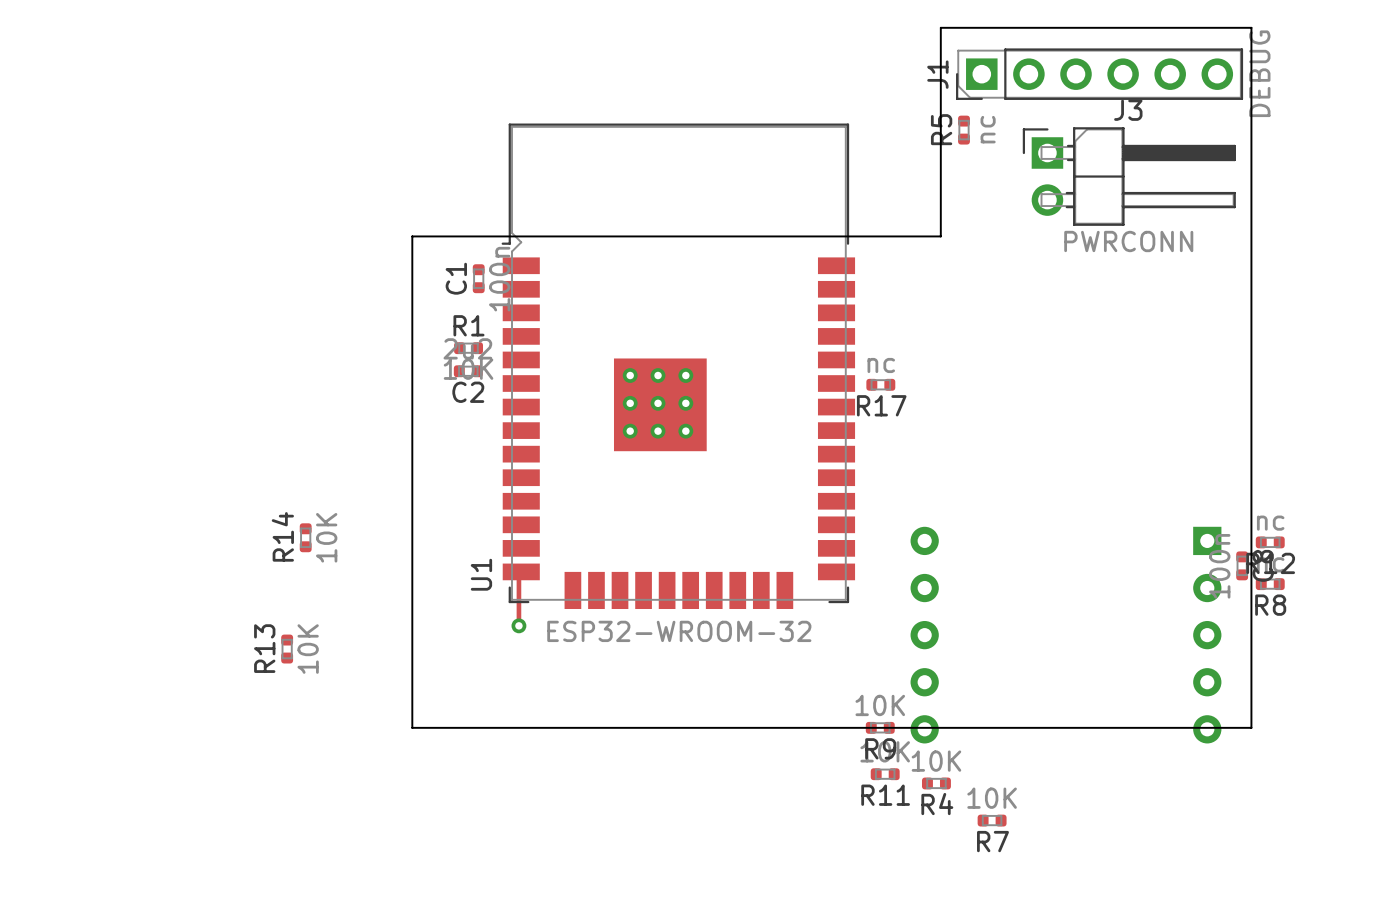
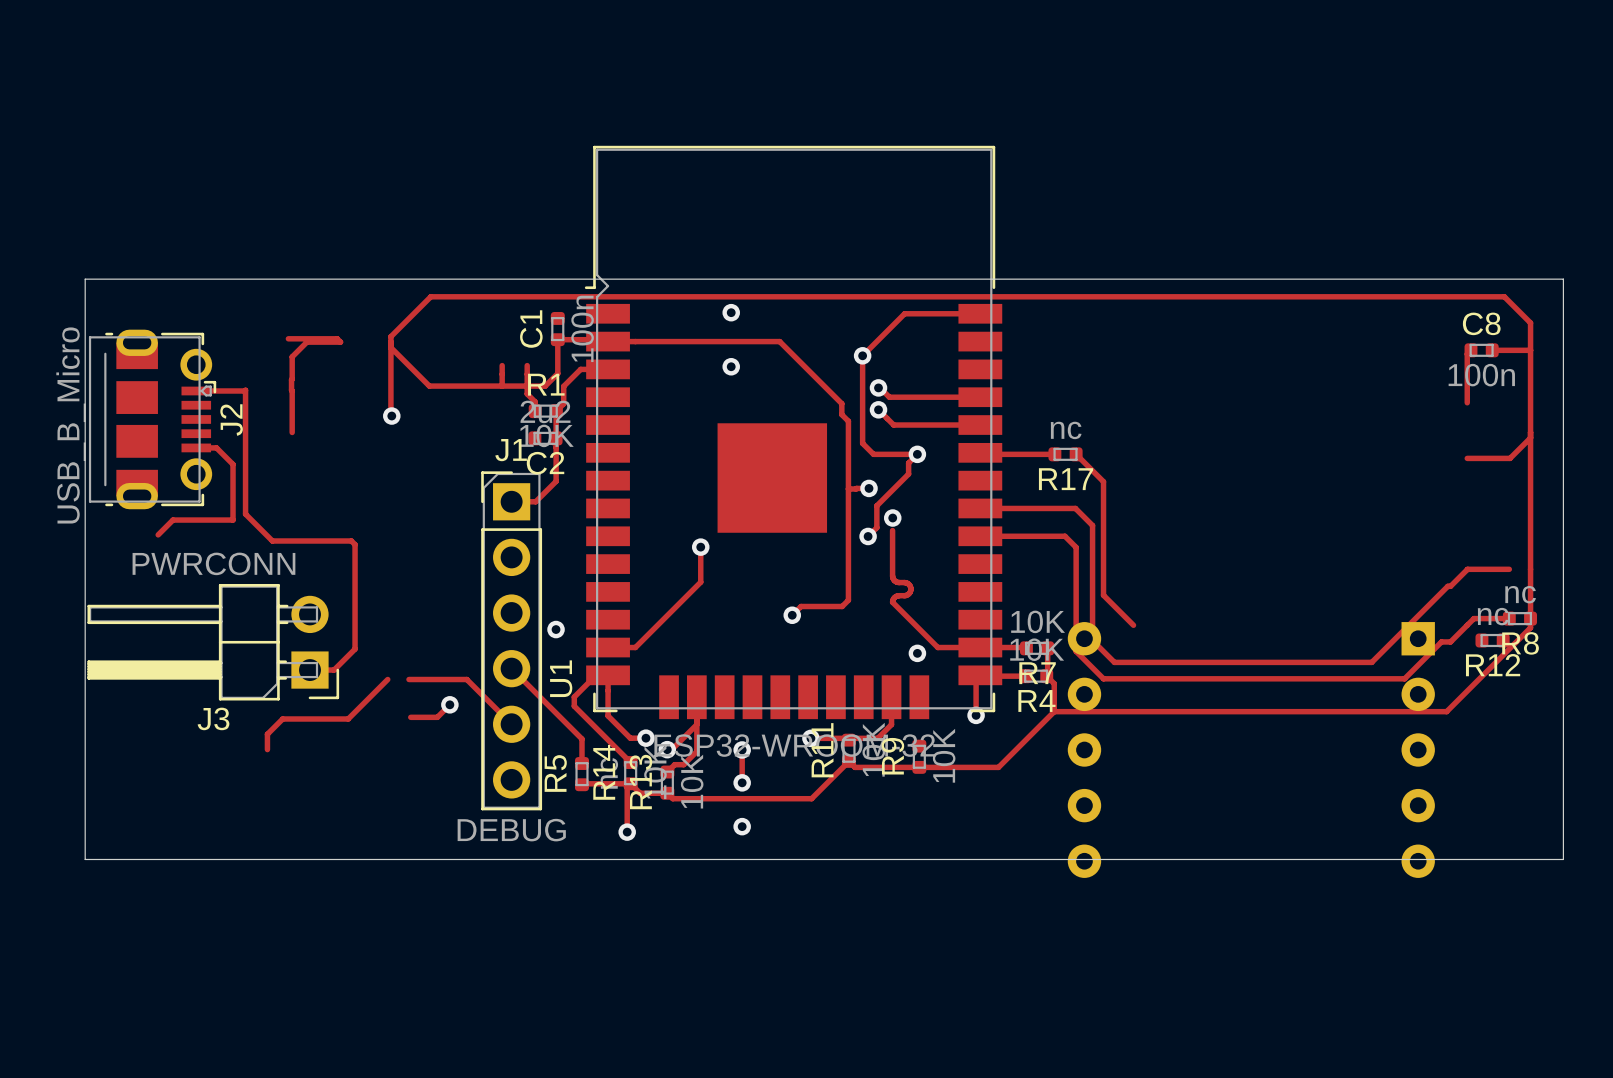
J1 rotation: 0° (1099, 74) -> 90° clockwise (511, 640)
J1 position: (1099, 74) -> (511, 640)
R5 position: (963, 130) -> (581, 774)
J3 rotation: 0° (1129, 176) -> 180° (213, 642)
J3 position: (1129, 176) -> (213, 642)
board edge: (412, 236) (412, 727) -> (479, 279) (85, 279) (85, 859) (479, 859)
board edge: (940, 236) (940, 27) (1251, 27) (1251, 727) -> (1103, 279) (1563, 279) (1563, 859) (1470, 859)
via: none -> (731, 312)
track: none -> (980, 313) (904, 313) (862, 355) (862, 443) (873, 454) (917, 454) (908, 463) (908, 474) (876, 505) (876, 527) (868, 536)
track: none -> (288, 338) (337, 338) (340, 342) (306, 342) (292, 356) (292, 432)
track: none -> (390, 347) (429, 386) (545, 386) (557, 373) (557, 339) (779, 341) (841, 403) (841, 414) (848, 421) (848, 600) (842, 606) (801, 606) (792, 615)
track: none -> (1470, 350) (1467, 354) (1467, 402)
track: none -> (1492, 350) (1530, 350)
via: none -> (862, 355)
track: none -> (502, 365) (502, 386)
track: none -> (527, 365) (527, 393) (535, 401) (535, 411)
via: none -> (731, 366)
track: none -> (608, 369) (580, 369) (563, 386) (563, 403) (556, 411) (556, 481) (535, 501) (511, 501)
track: none -> (878, 387) (889, 397) (980, 397)
via: none -> (878, 387)
track: none -> (196, 390) (245, 390) (245, 514) (272, 541) (351, 541) (355, 544) (355, 649) (334, 670) (309, 670)
track: none -> (878, 409) (893, 425) (980, 425)
via: none -> (878, 409)
track: none -> (391, 416) (390, 336) (430, 296) (1504, 296) (1530, 322) (1530, 627) (1446, 711) (1054, 711)
via: none -> (391, 416)
J2: none -> USB_B_Micro (152, 419)
track: none -> (1530, 437) (1510, 458) (1467, 458)
via: (630, 375) -> none
via: (658, 375) -> none
via: (685, 375) -> none
track: none -> (196, 447) (216, 447) (233, 464) (233, 520) (173, 520) (158, 534)
track: none -> (980, 452) (1054, 454)
via: none -> (917, 454)
R17 position: (880, 384) -> (1065, 454)
track: none -> (1076, 454) (1103, 481) (1103, 595) (1133, 625)
via: (630, 403) -> none
via: (658, 403) -> none
via: (685, 403) -> none
track: none -> (869, 488) (848, 488)
via: none -> (869, 488)
track: none -> (980, 508) (1075, 508) (1092, 525) (1092, 640) (1114, 662) (1371, 662) (1447, 586) (1450, 586) (1467, 569) (1509, 569)
via: (630, 431) -> none
via: (658, 431) -> none
via: (685, 431) -> none
via: none -> (892, 518)
track: none -> (892, 530) (892, 577) (896, 581) (908, 583) (910, 589) (907, 595) (895, 597) (892, 602) (937, 647) (1026, 648)
via: none -> (868, 536)
track: none -> (980, 536) (1064, 536) (1076, 547) (1076, 651) (1103, 678) (1404, 678) (1441, 641) (1450, 641) (1473, 618) (1509, 618)
track: none -> (700, 547) (700, 582) (635, 647) (608, 647)
via: none -> (700, 547)
via: none -> (792, 615)
via: none -> (556, 629)
R14 position: (305, 537) -> (630, 773)
track: none -> (1047, 648) (1046, 676) (1054, 683) (1054, 711)
via: none -> (917, 653)
C8 rotation: 0° (1242, 565) -> 90° clockwise (1481, 350)
C8 position: (1242, 565) -> (1481, 350)
track: none -> (511, 668) (581, 739) (581, 763)
track: (521, 571) (518, 574) (518, 625) -> none
track: none -> (1025, 676) (980, 675) (976, 679) (976, 715)
track: none -> (387, 679) (348, 719) (282, 719) (267, 734) (267, 749)
track: none -> (409, 679) (466, 679) (511, 724)
R8 position: (1270, 584) -> (1519, 618)
track: none -> (696, 697) (696, 751) (683, 764) (674, 764) (667, 772)
track: none -> (891, 697) (891, 724) (877, 738) (810, 738)
track: none -> (449, 704) (437, 717) (410, 717)
via: none -> (449, 704)
track: none -> (1054, 711) (998, 767) (855, 767) (848, 761) (811, 798) (672, 798) (667, 793) (640, 793) (630, 783)
via: none -> (976, 715)
track: none -> (696, 724) (671, 749) (667, 749)
via: (518, 625) -> none
track: none -> (645, 738) (630, 738) (608, 715) (608, 675) (596, 675) (574, 697) (574, 706) (630, 762)
via: none -> (645, 738)
via: none -> (810, 738)
via: none -> (667, 749)
track: none -> (742, 749) (742, 782)
via: none -> (742, 749)
R13 position: (287, 649) -> (667, 782)
via: none -> (742, 782)
track: none -> (630, 783) (581, 784)
track: none -> (630, 783) (627, 787) (627, 832)
via: none -> (742, 826)
via: none -> (627, 832)
R9 rotation: 0° (880, 727) -> 90° clockwise (919, 756)
R9 position: (880, 727) -> (919, 756)
R11 rotation: 0° (885, 774) -> 90° clockwise (848, 750)
R11 position: (885, 774) -> (848, 750)
R4 position: (936, 783) -> (1036, 676)
R7 position: (992, 820) -> (1037, 648)

